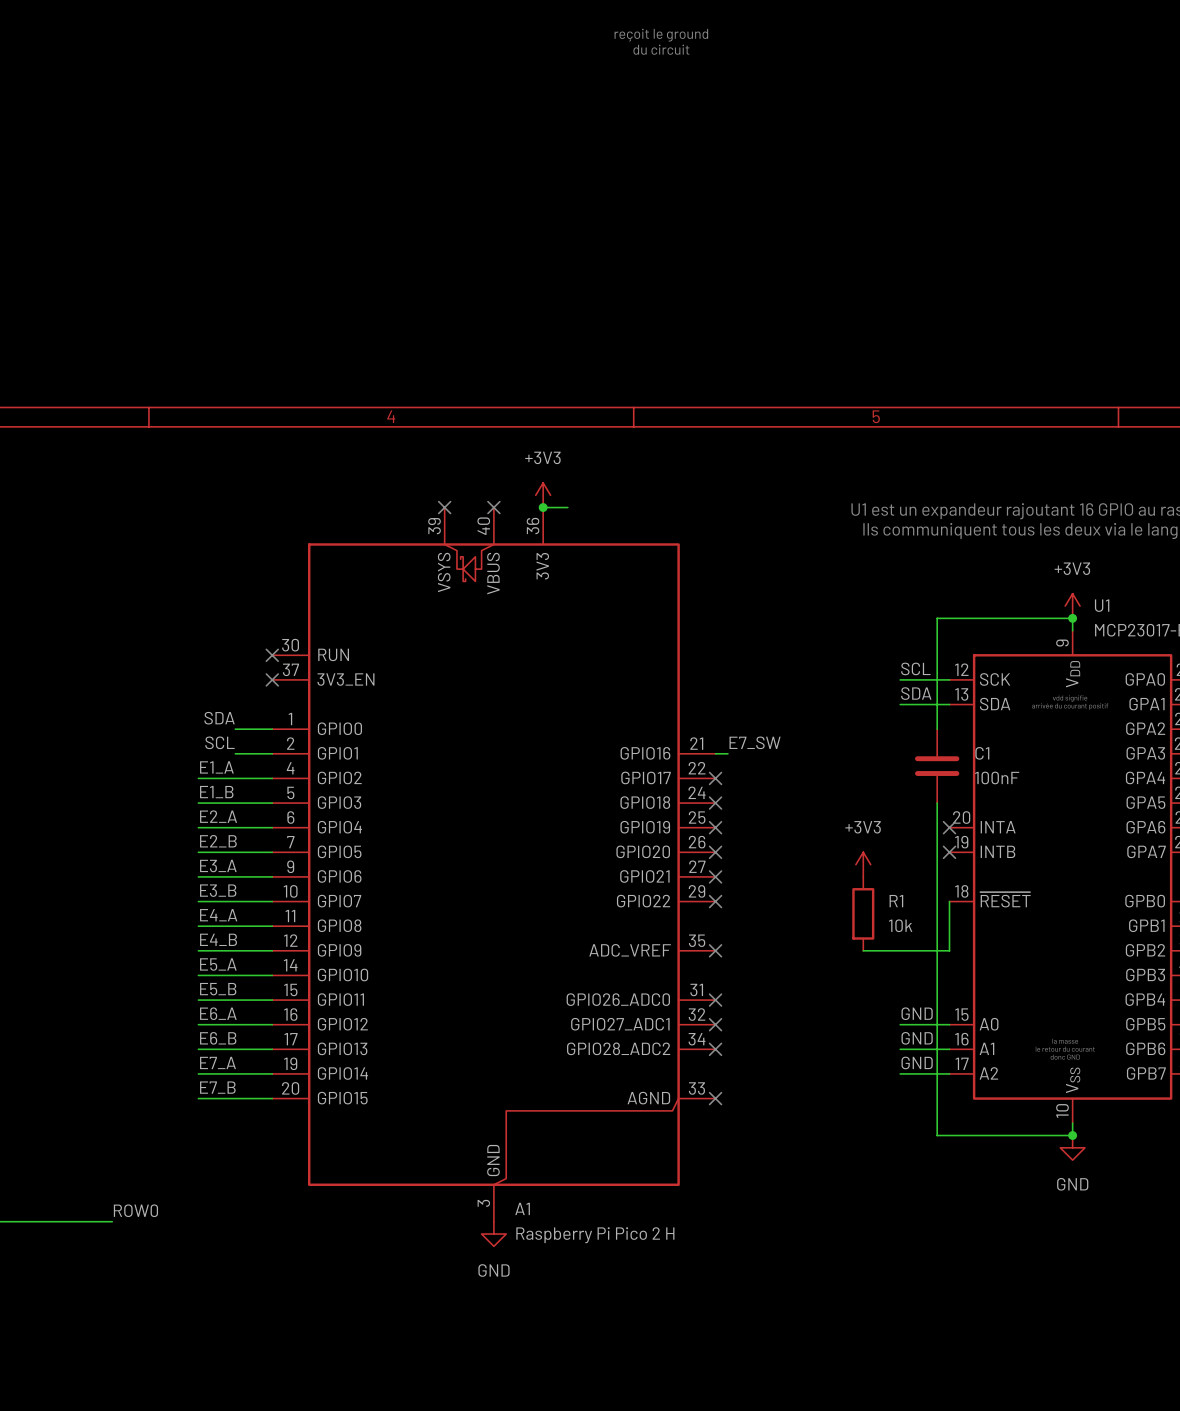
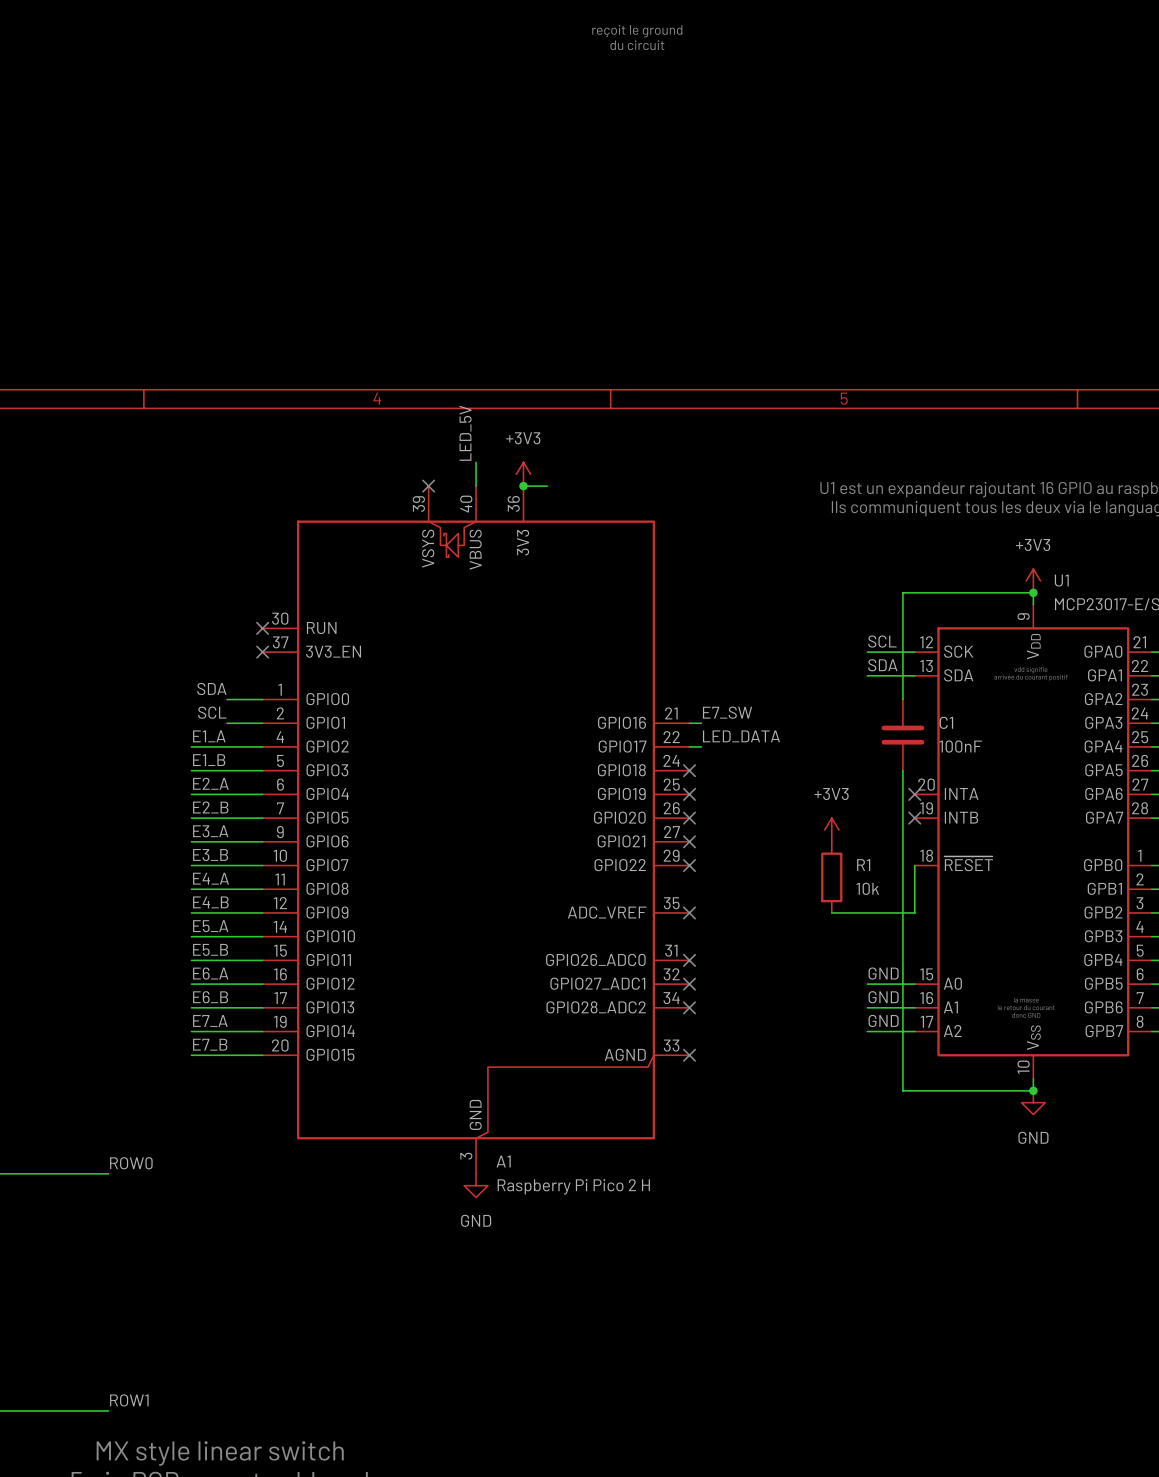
label: none -> LED_5V (465, 433)
wire: none -> (476, 462) (476, 486)
no-connect mark: (493, 507) -> none
label: none -> LED_DATA (741, 736)
wire: none -> (689, 746) (701, 746)
no-connect mark: (715, 778) -> none

